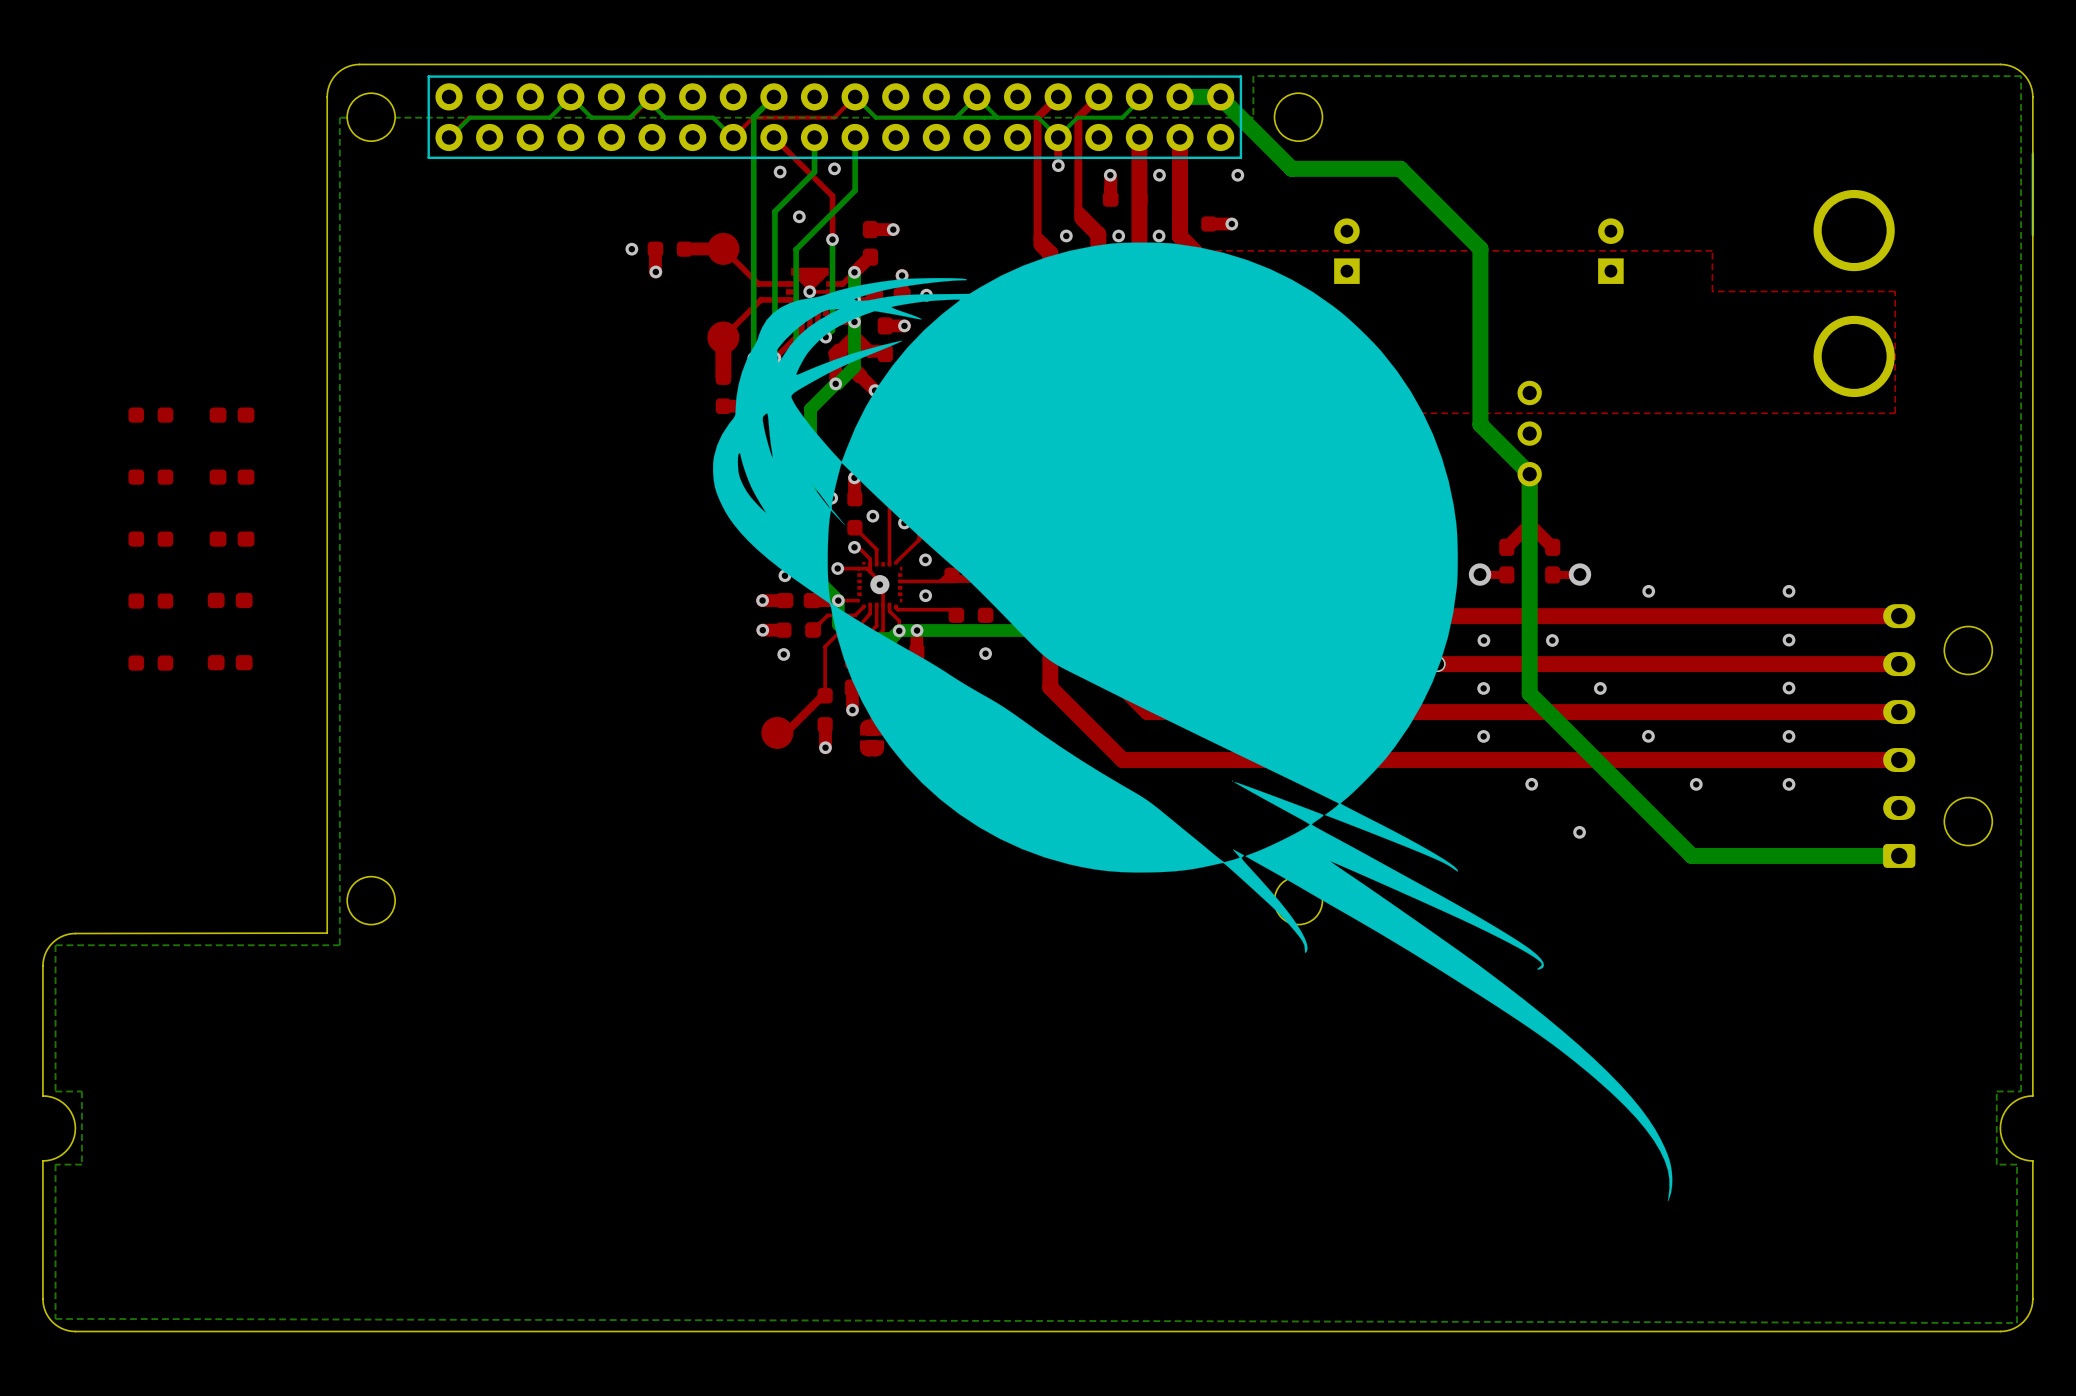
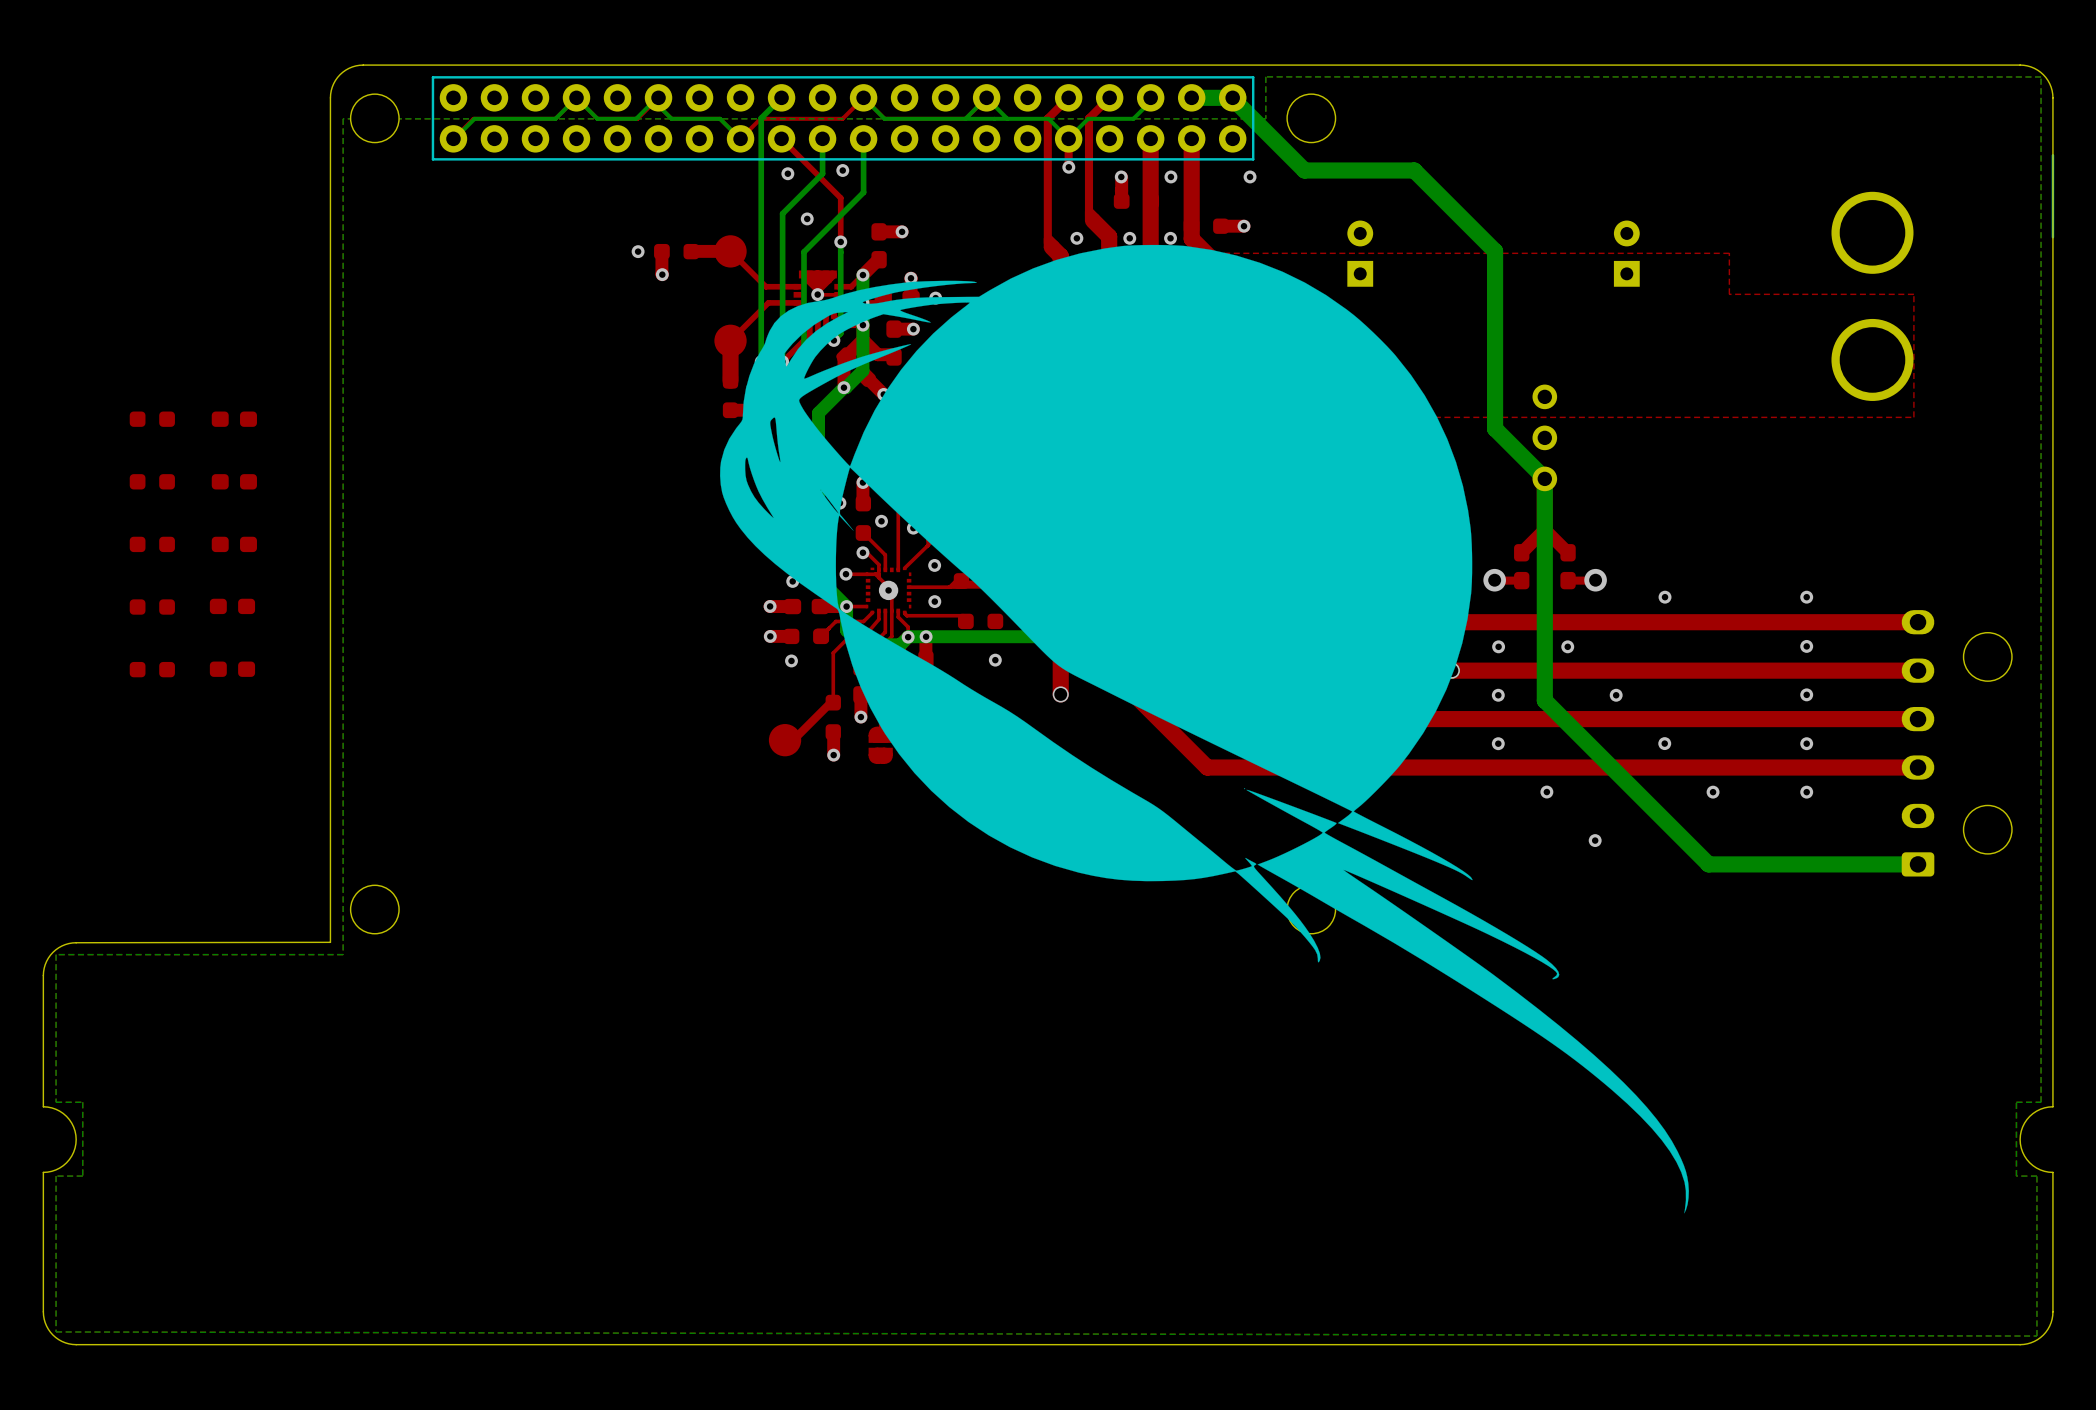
top track: (1050, 687) (1122, 760) (1195, 760) -> (1158, 719) (1207, 767)
via: none -> (1060, 694)

